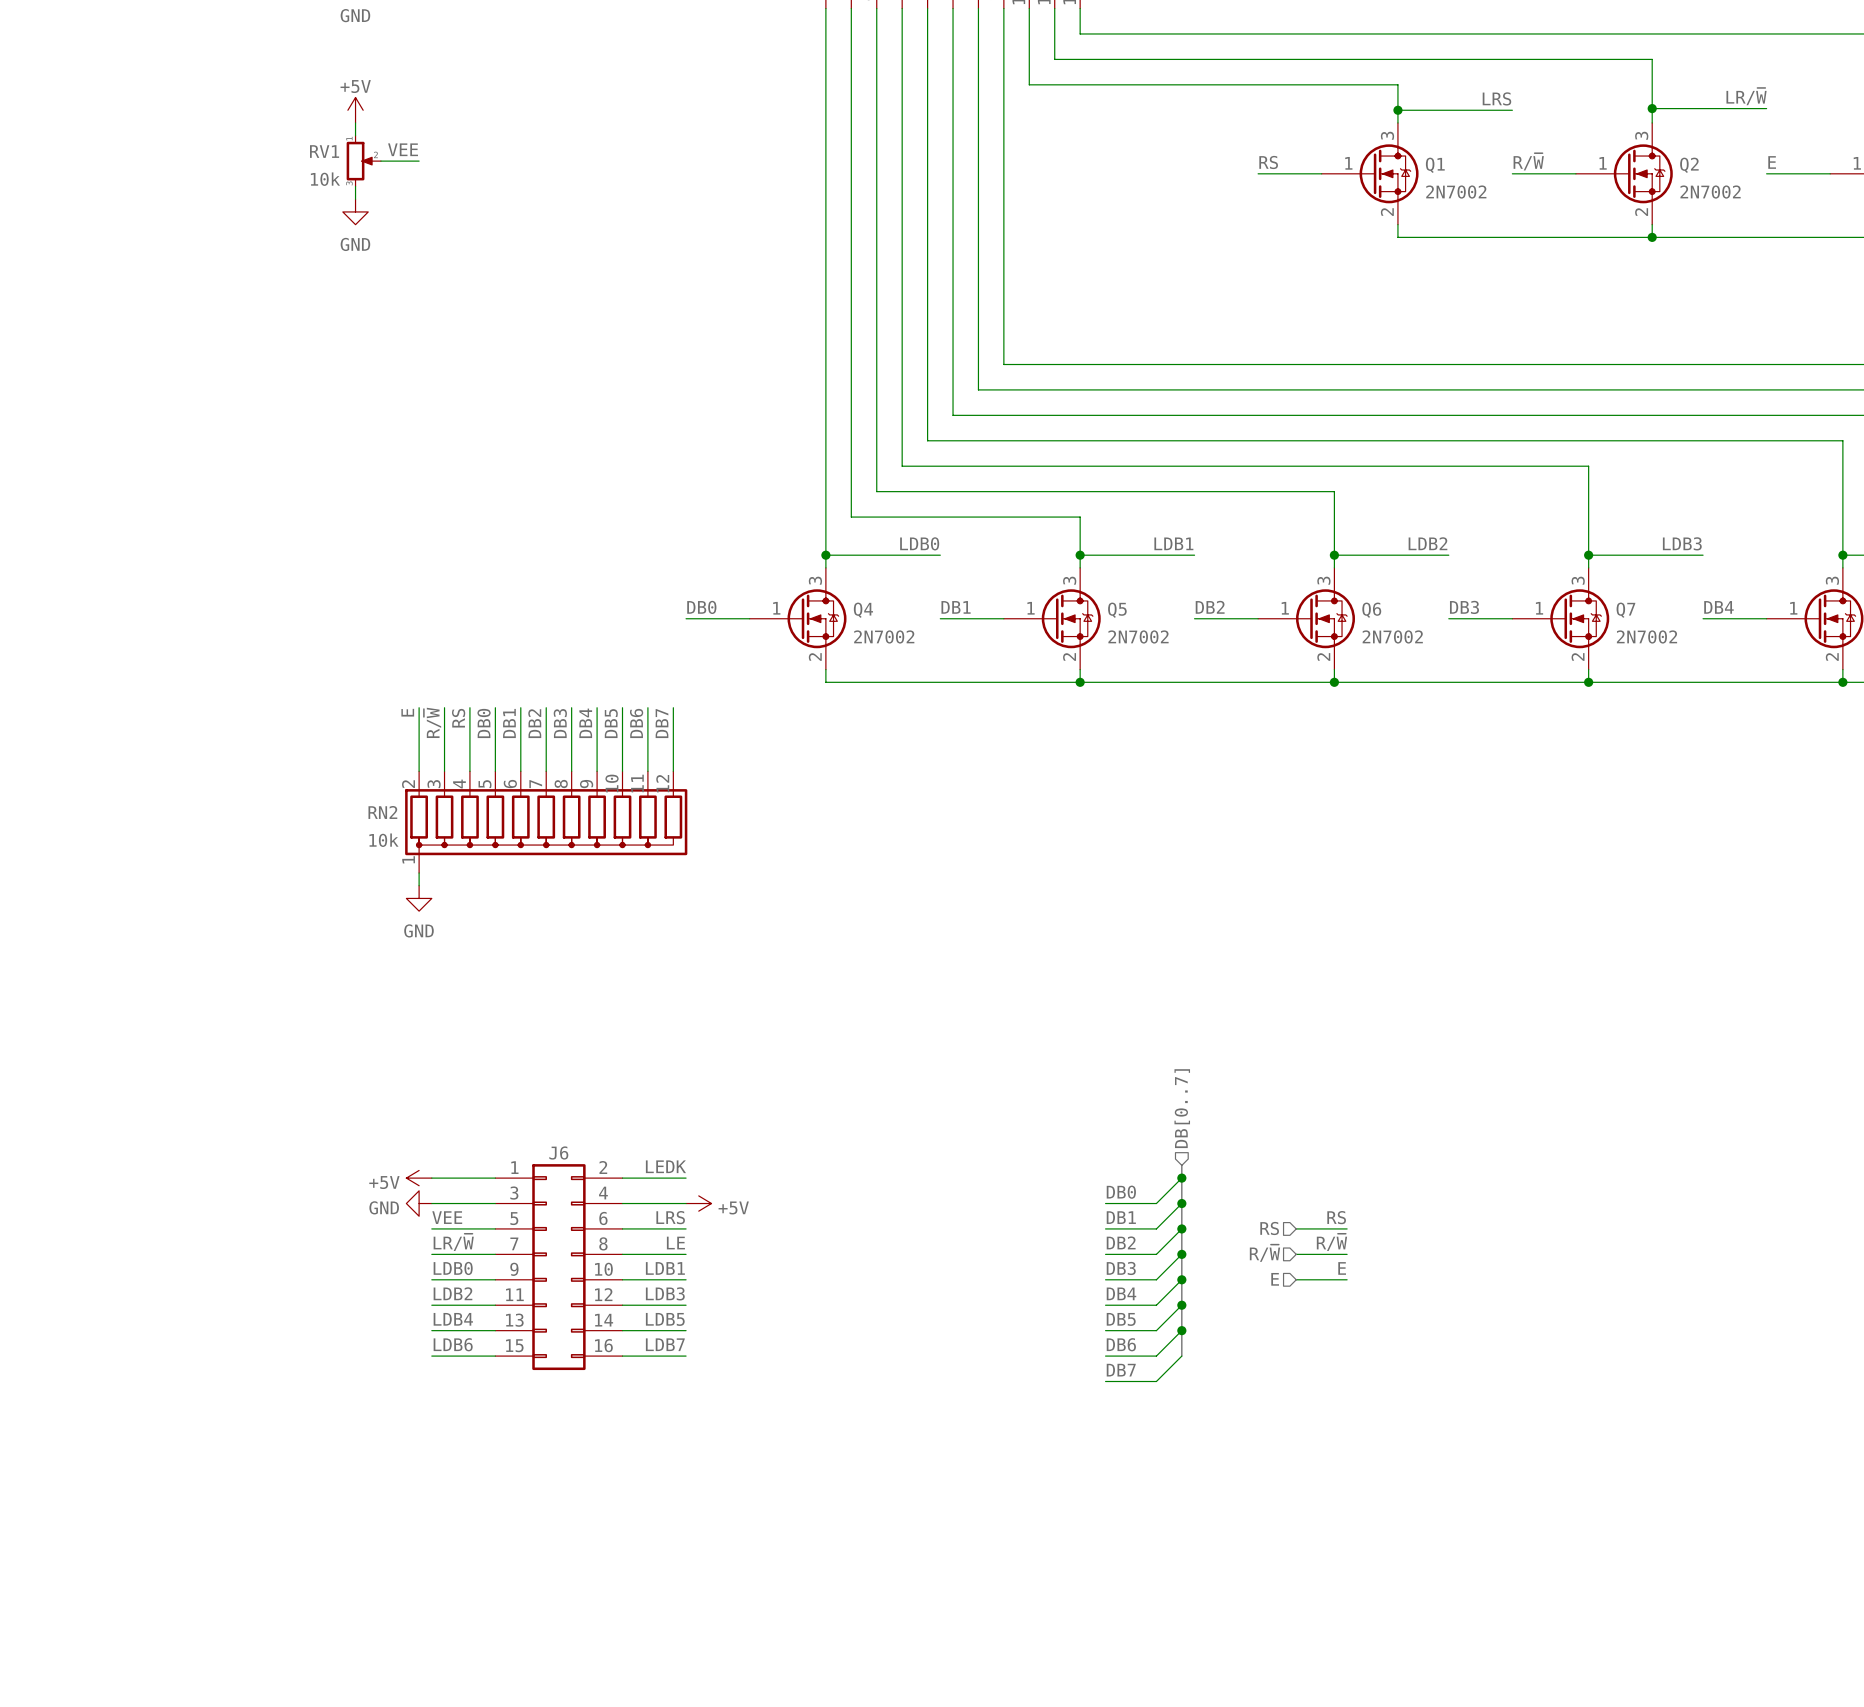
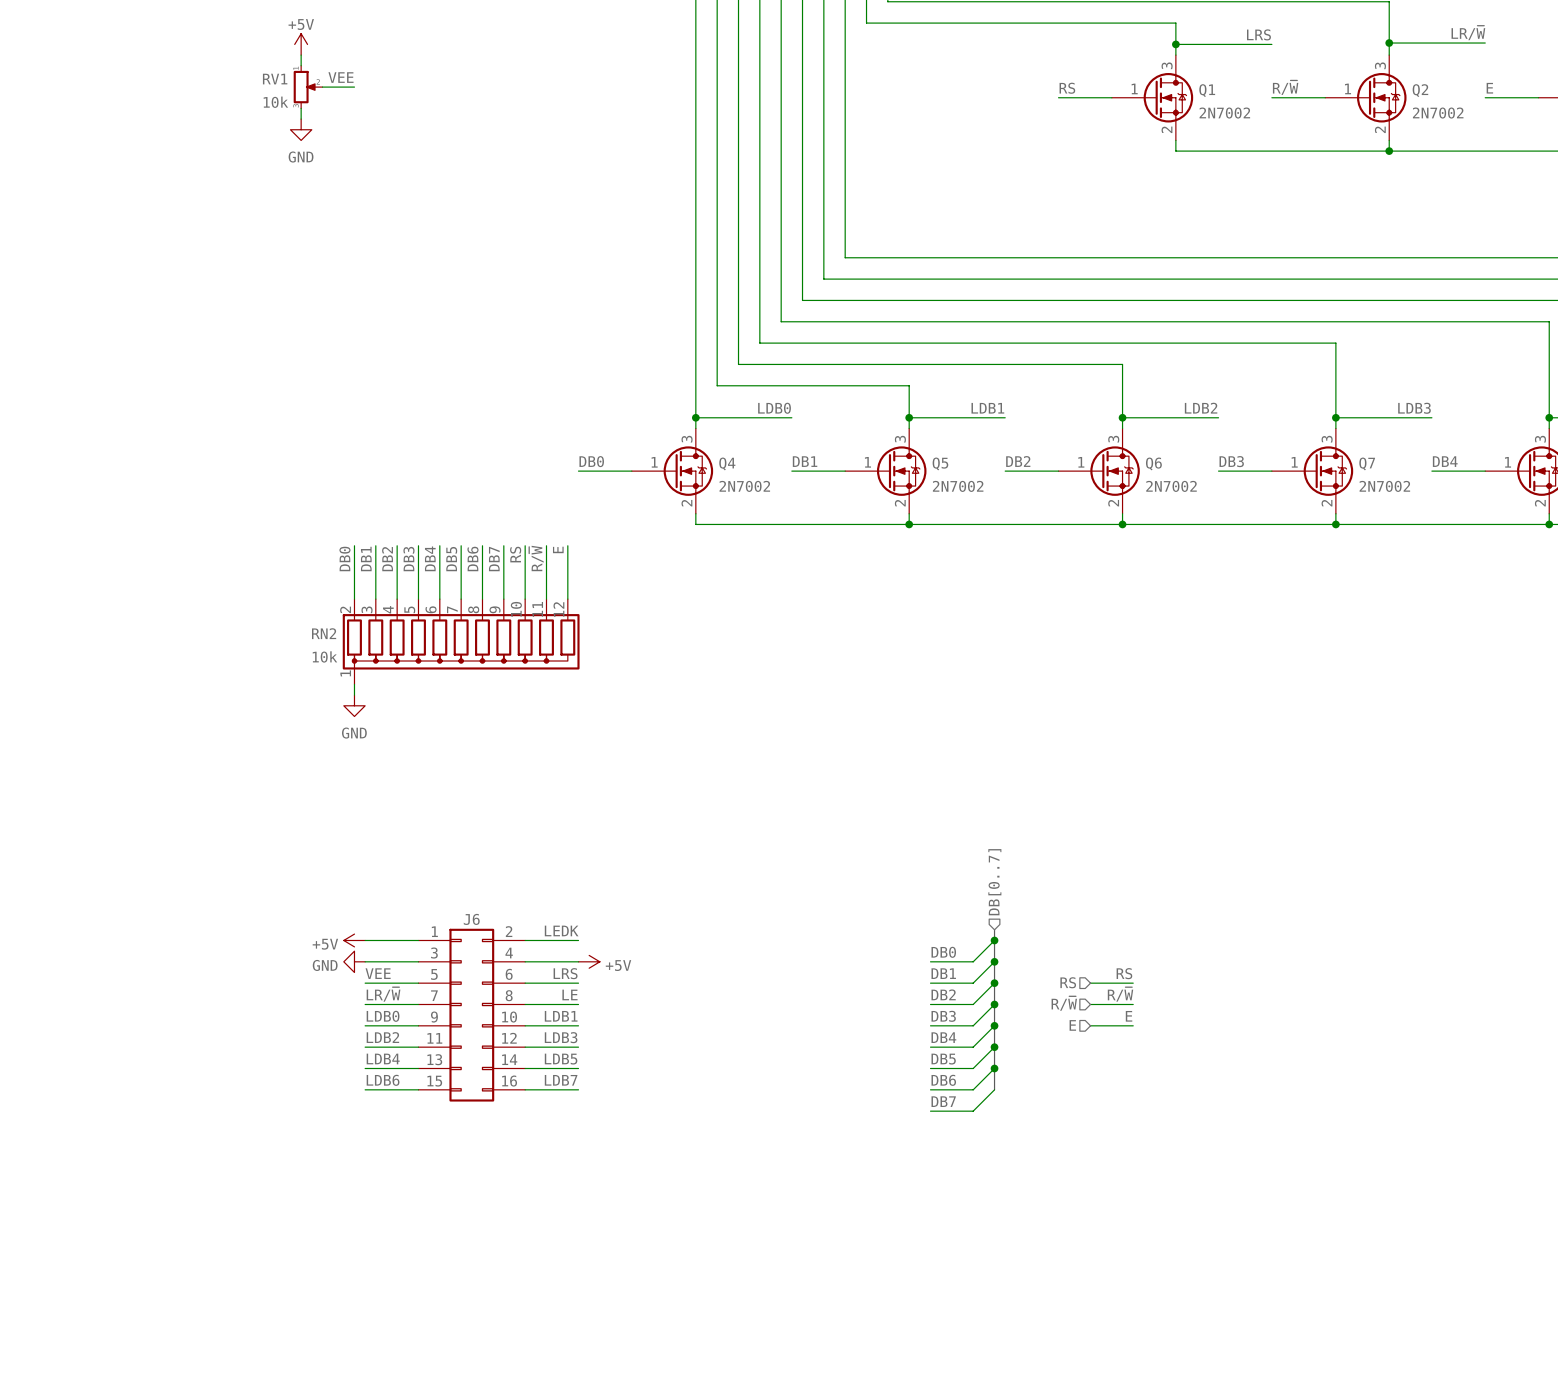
label: E (407, 712) -> DB0 (344, 558)
label: RS (458, 718) -> DB2 (387, 559)
label: R/~{W} (432, 722) -> DB1 (366, 559)
label: DB0 (484, 723) -> DB3 (408, 559)
label: DB1 (509, 723) -> DB4 (430, 558)
label: DB2 (534, 723) -> DB5 (451, 559)
label: DB3 (560, 723) -> DB6 (472, 558)
label: DB4 (585, 723) -> DB7 (494, 559)
label: DB5 (611, 723) -> RS (515, 554)
label: DB6 (636, 723) -> R/~{W} (536, 558)
label: DB7 (662, 723) -> E (558, 549)

